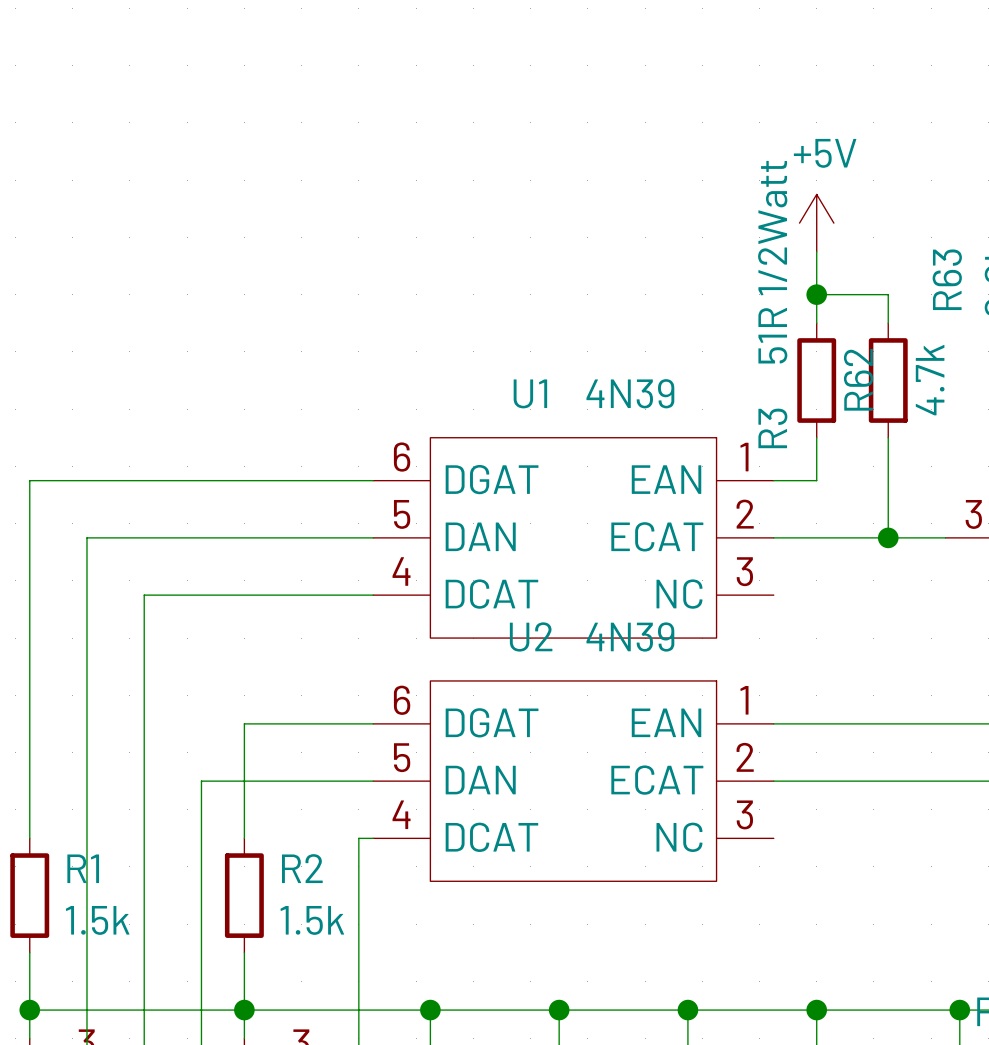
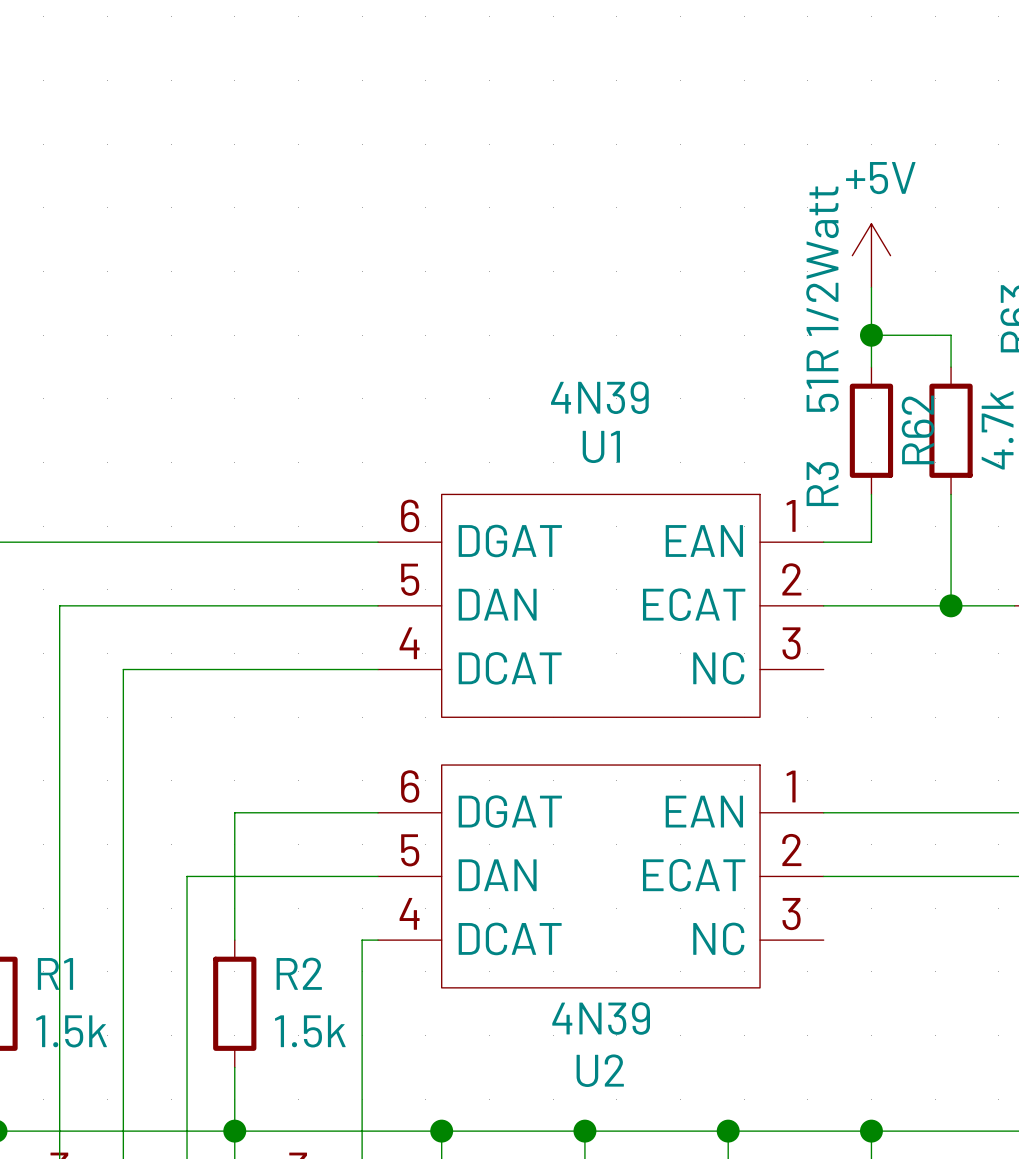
U1 name position: U1 (530, 393) -> U1 (601, 446)
U1 value position: 4N39 (630, 393) -> 4N39 (599, 397)
U2 name position: U2 (531, 636) -> U2 (600, 1070)
U2 value position: 4N39 (630, 637) -> 4N39 (601, 1018)

